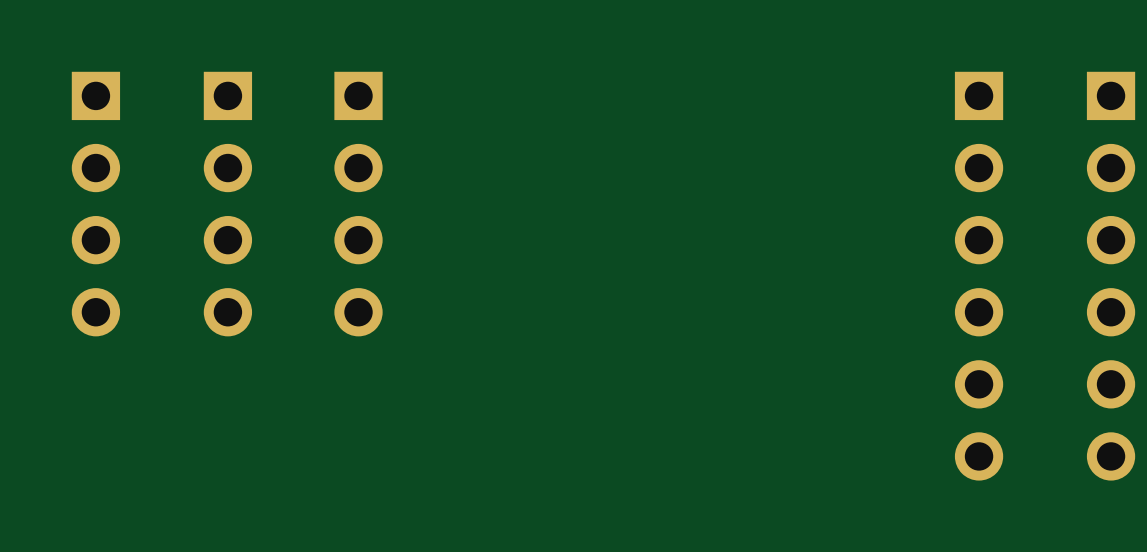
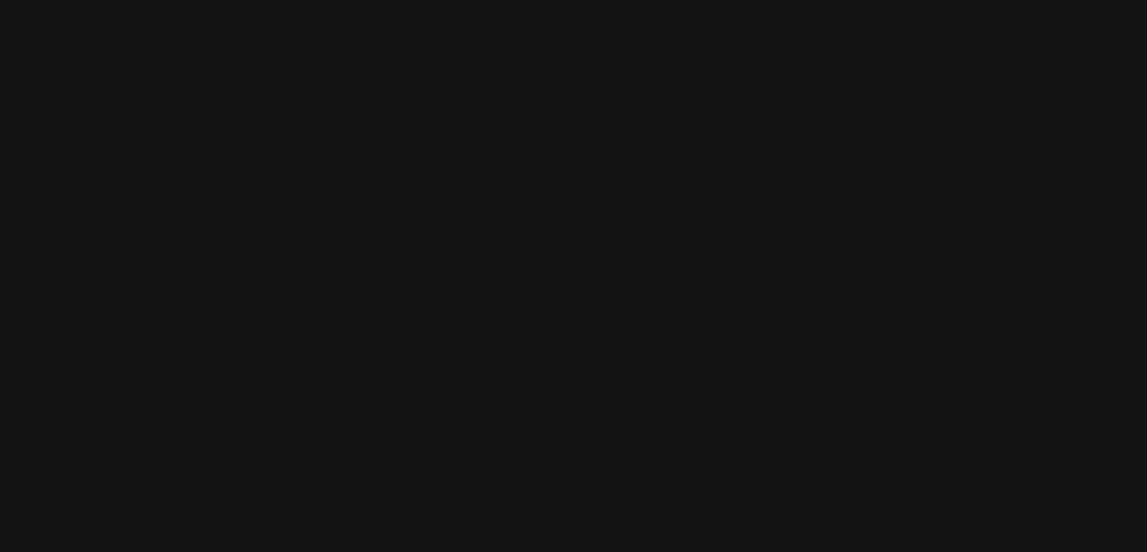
part: (95, 204) -> none
part: (227, 204) -> none
part: (358, 204) -> none
part: (979, 276) -> none
part: (1111, 276) -> none

